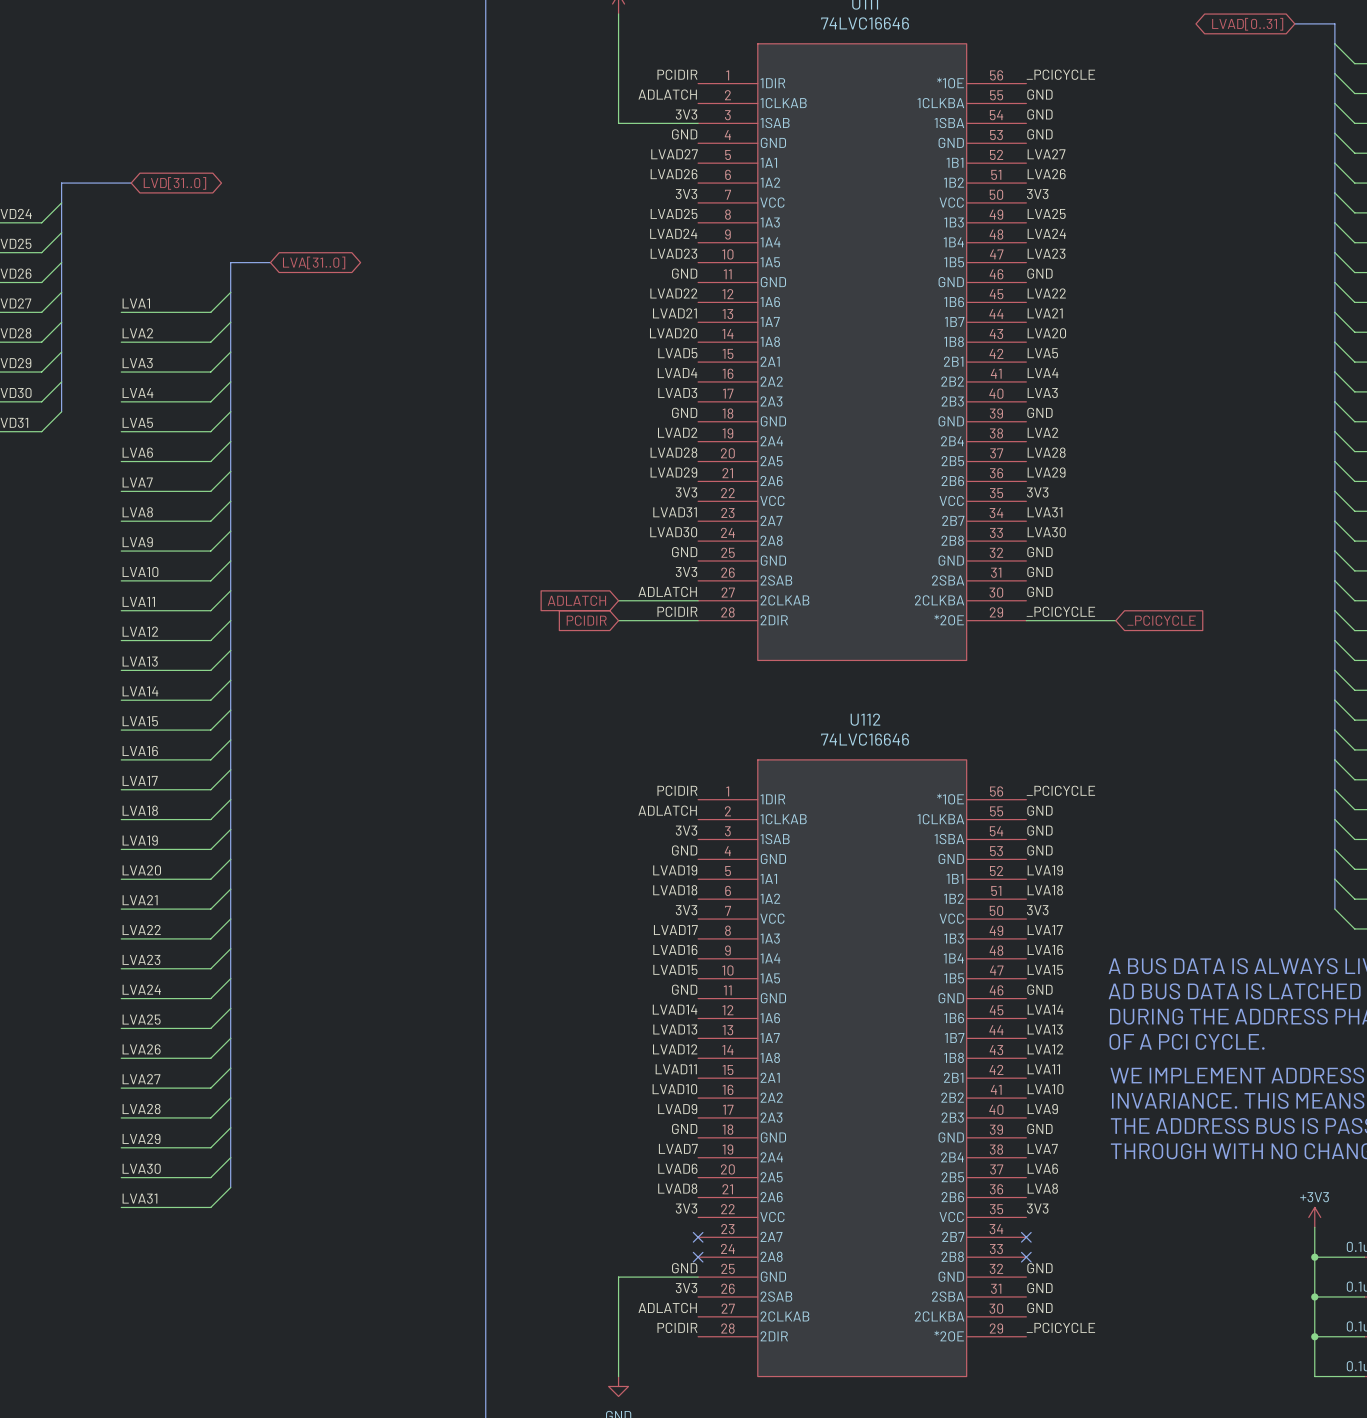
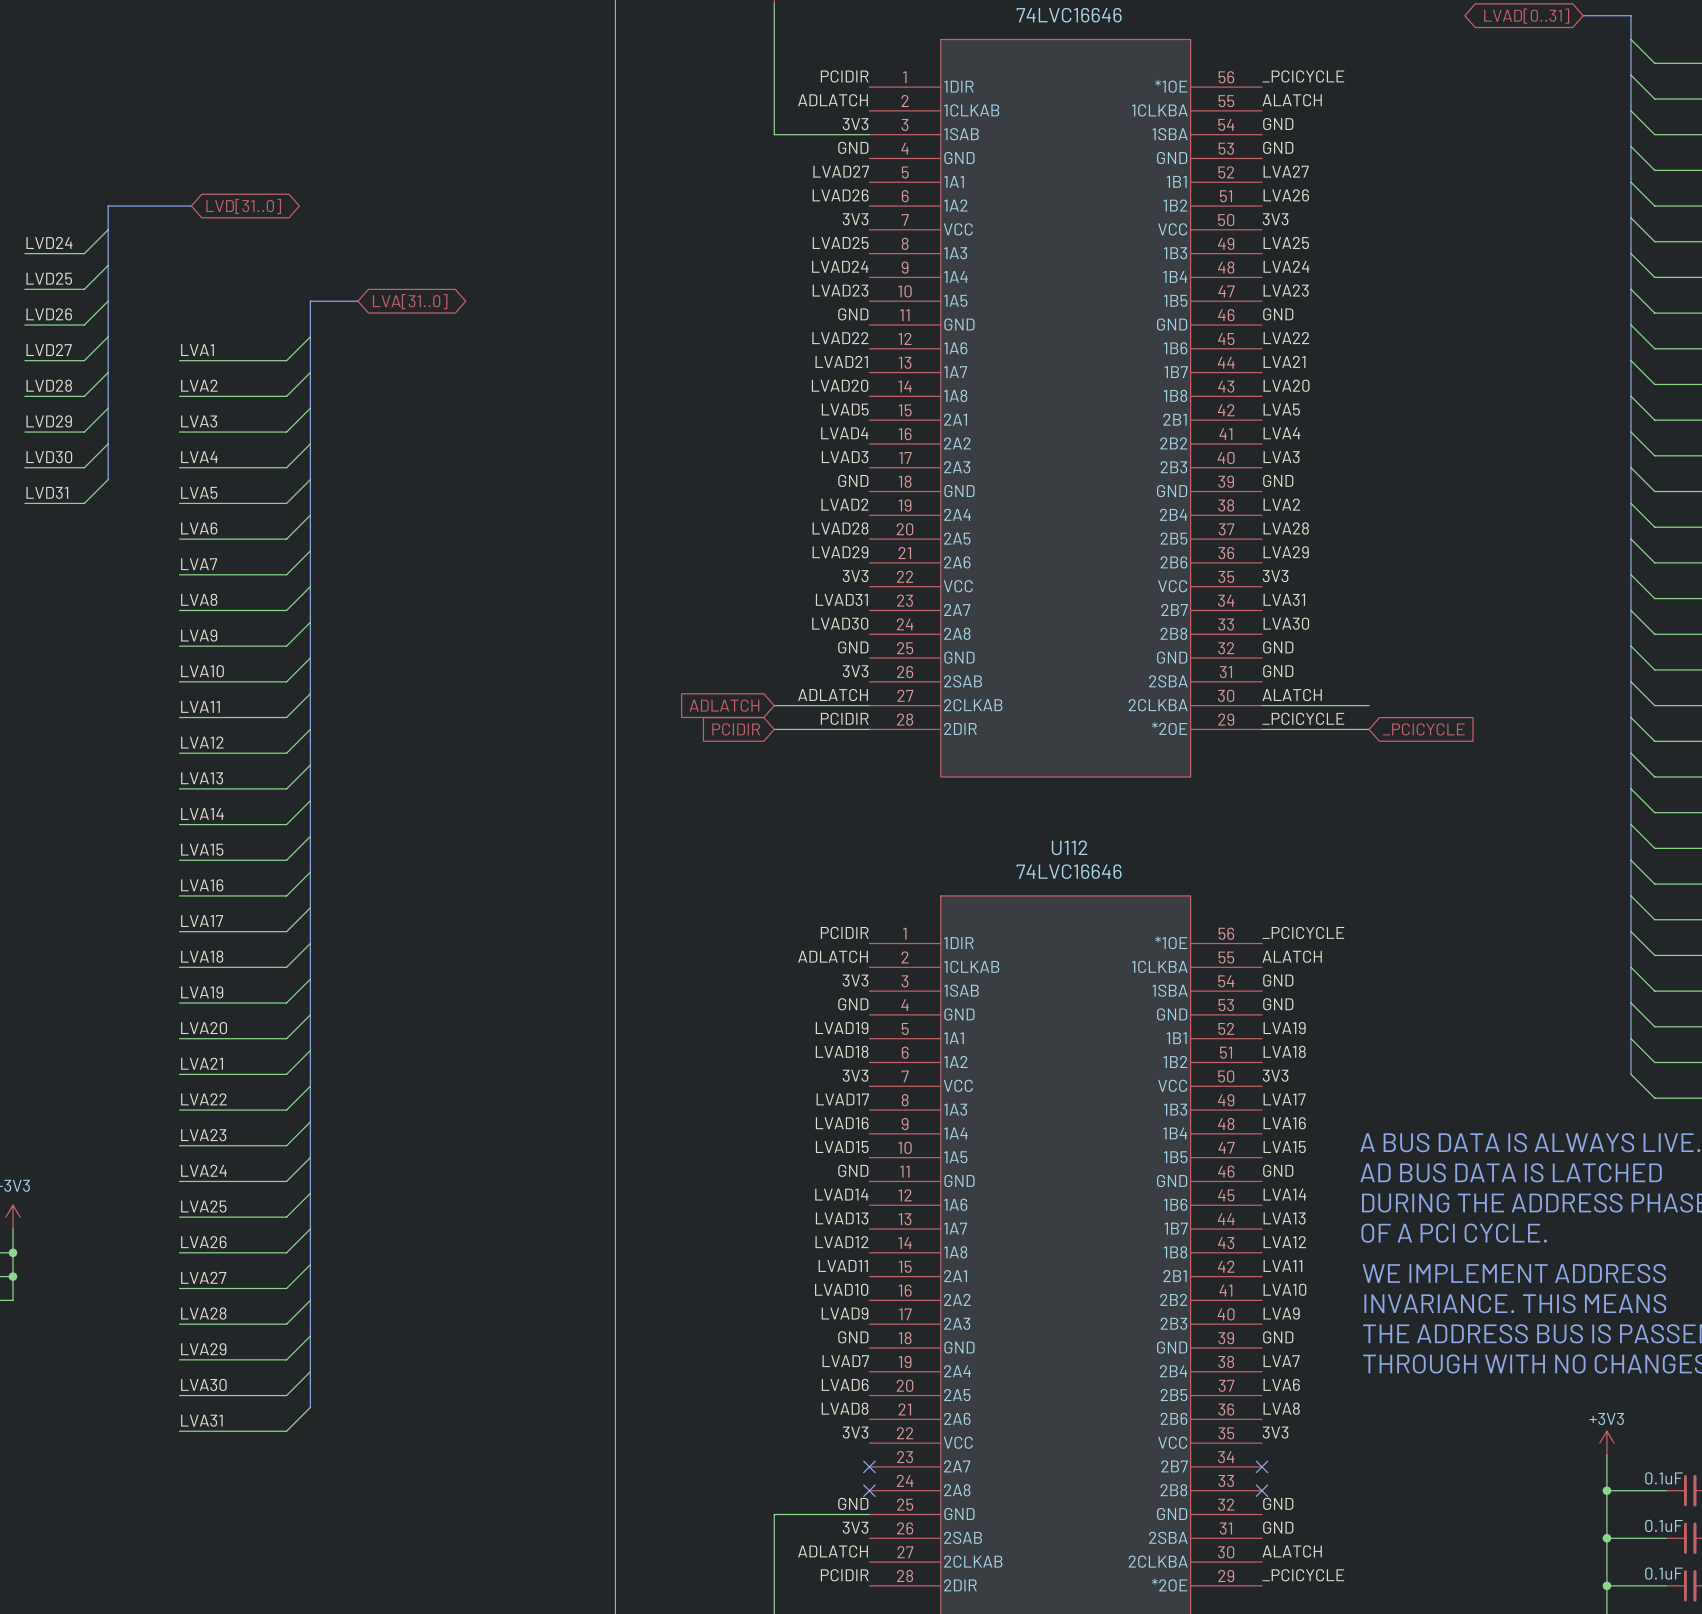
label: GND (1039, 94) -> ALATCH (1292, 100)
label: GND (1039, 591) -> ALATCH (1292, 695)
wire: none -> (1261, 705) (1369, 705)
label: GND (1039, 810) -> ALATCH (1292, 956)
label: GND (1039, 1307) -> ALATCH (1292, 1551)

